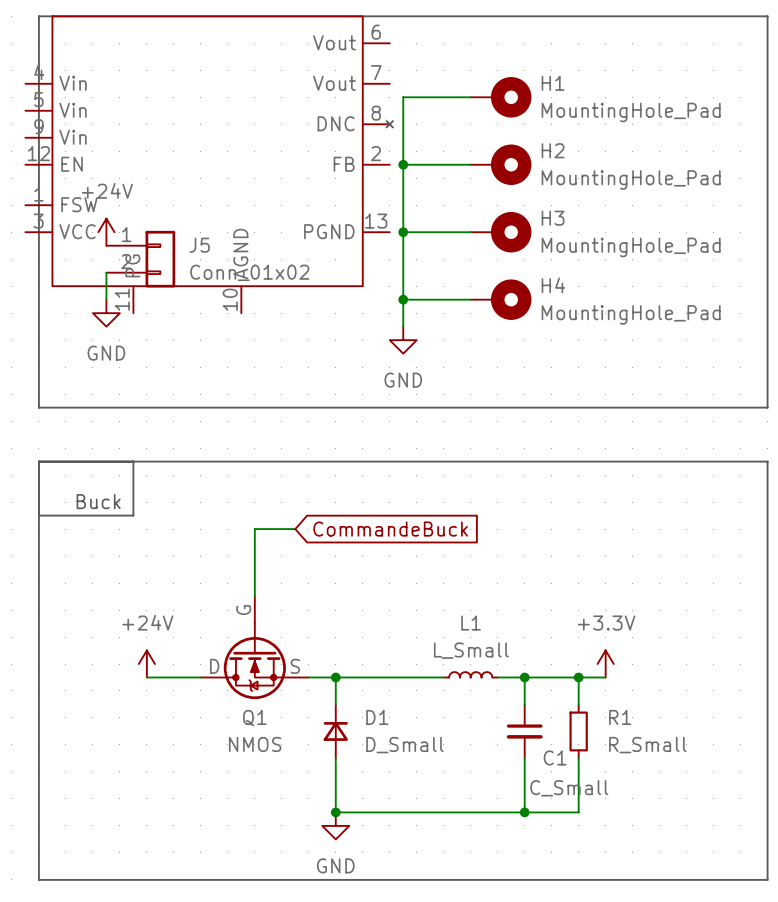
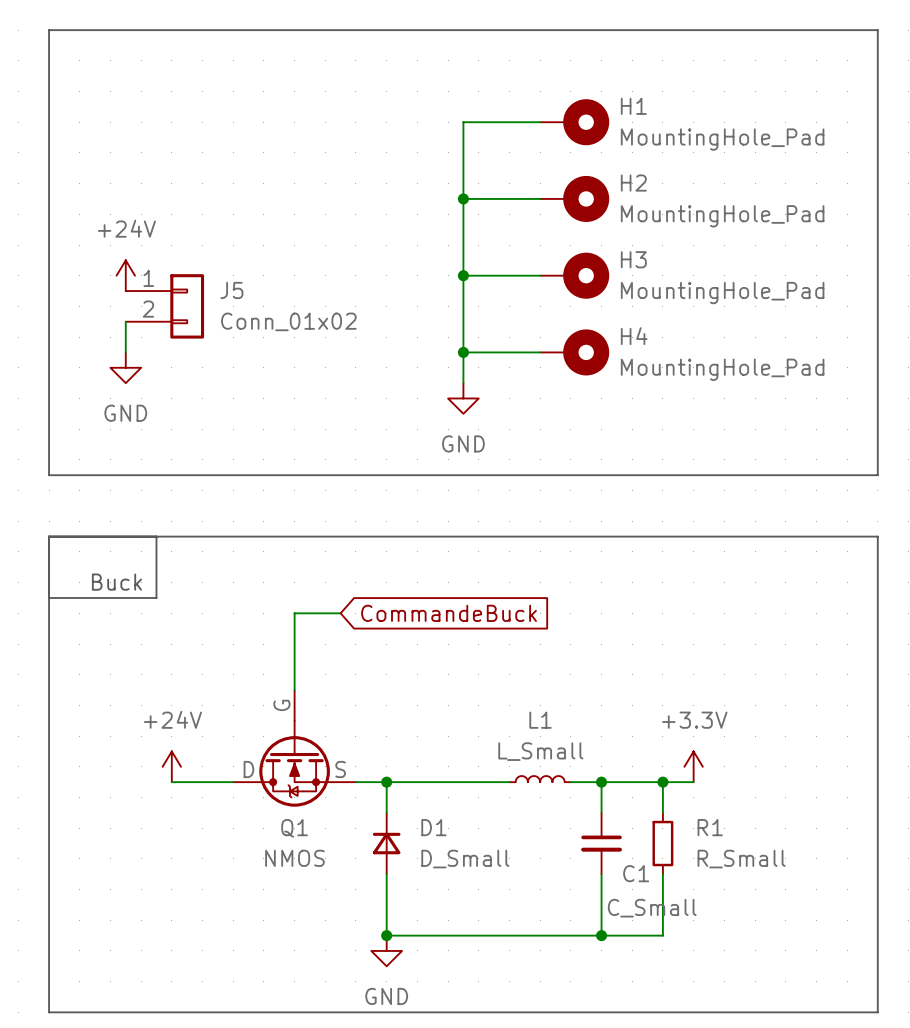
part: (209, 164) -> none

